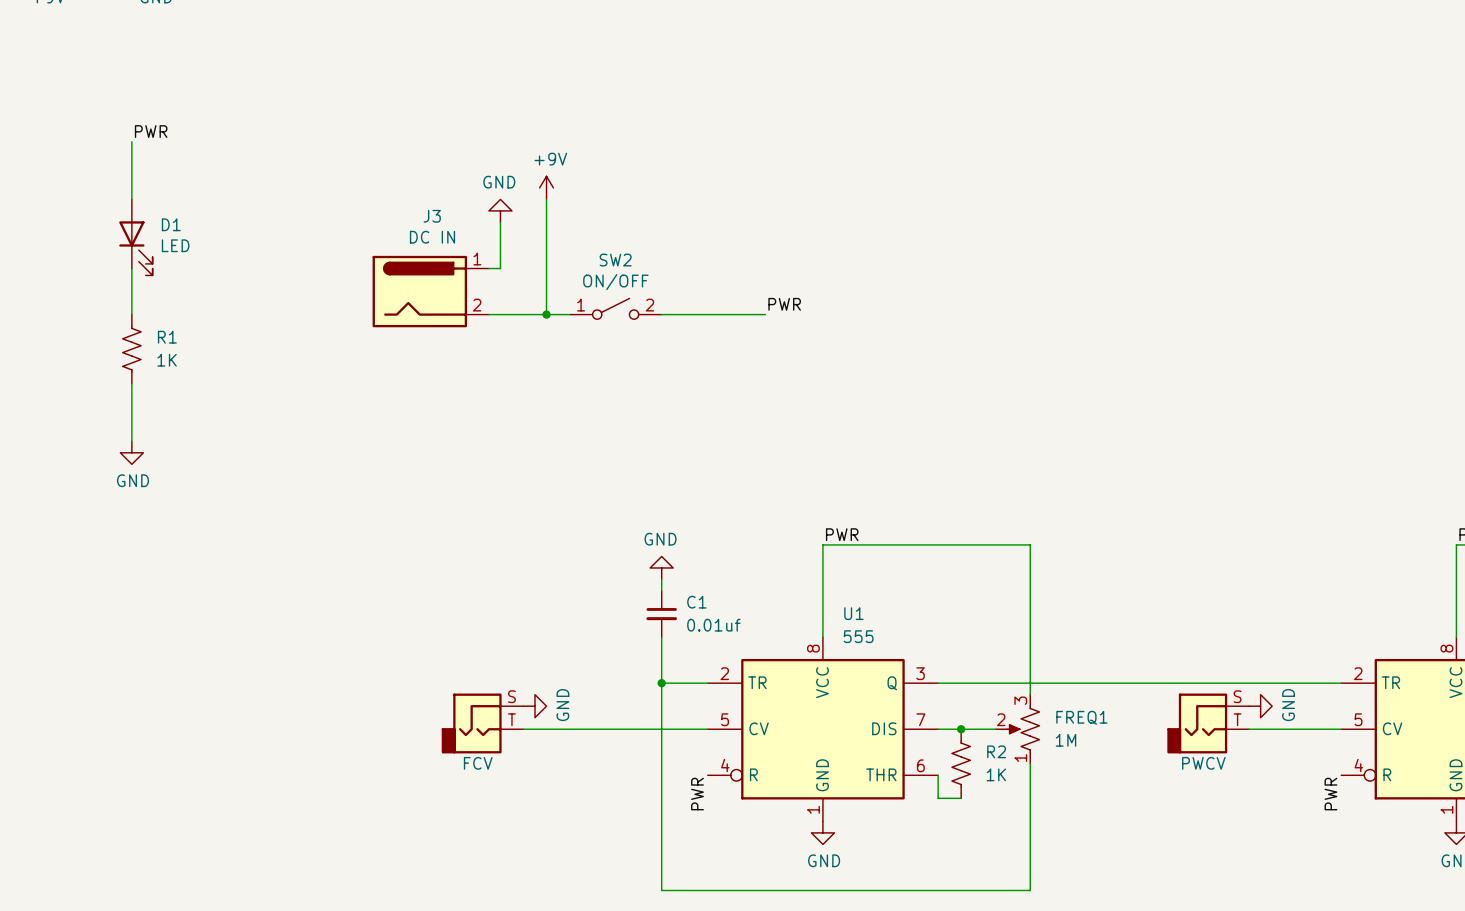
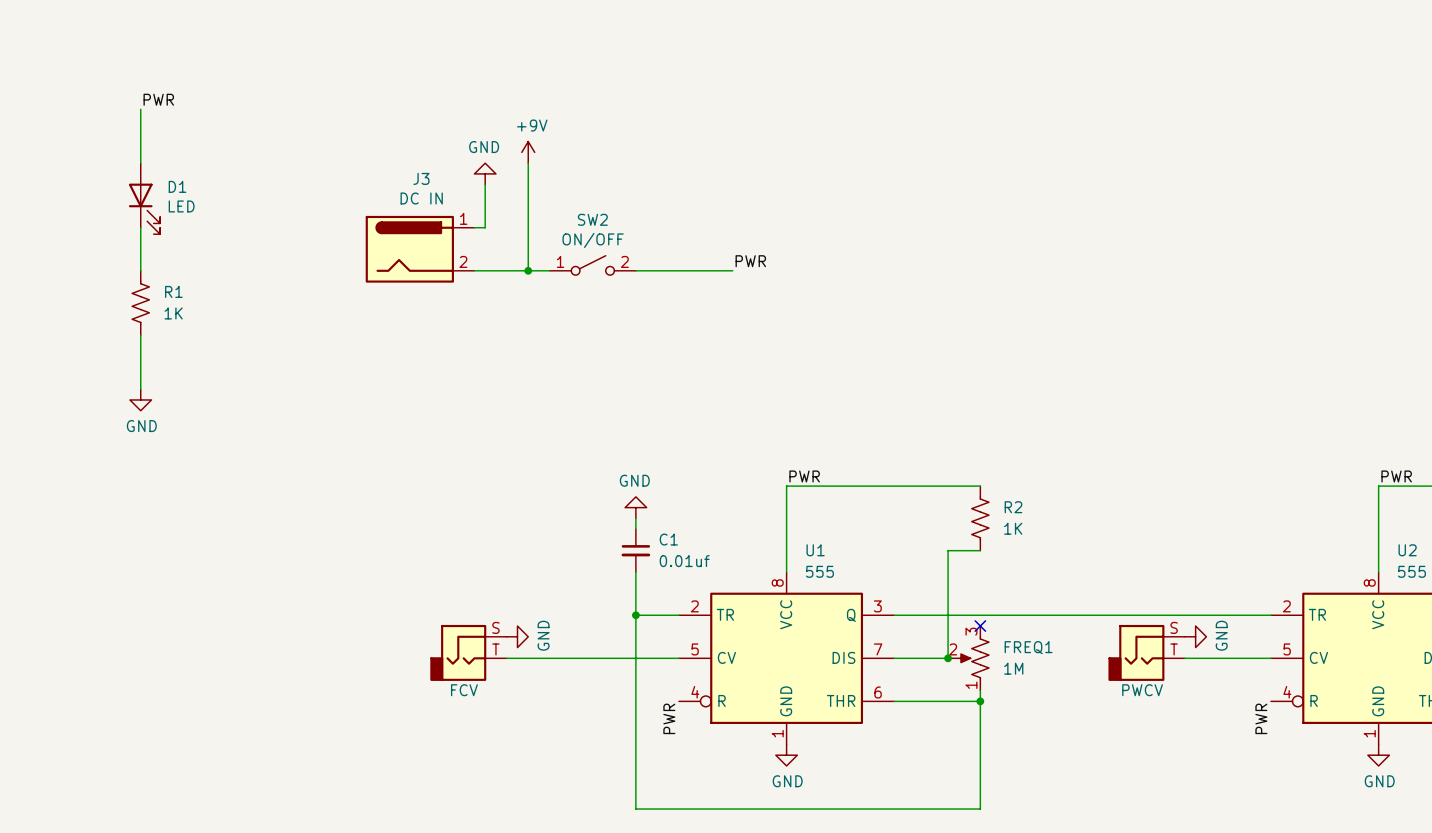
wire: (1030, 544) (1030, 694) -> none
wire: none -> (980, 550) (948, 550) (948, 658)
no-connect mark: none -> (980, 626)
junction position: (961, 729) -> (948, 658)
R2 position: (961, 763) -> (980, 518)
wire: (938, 775) (938, 798) (961, 798) -> (894, 701) (980, 701)
junction: none -> (980, 701)

